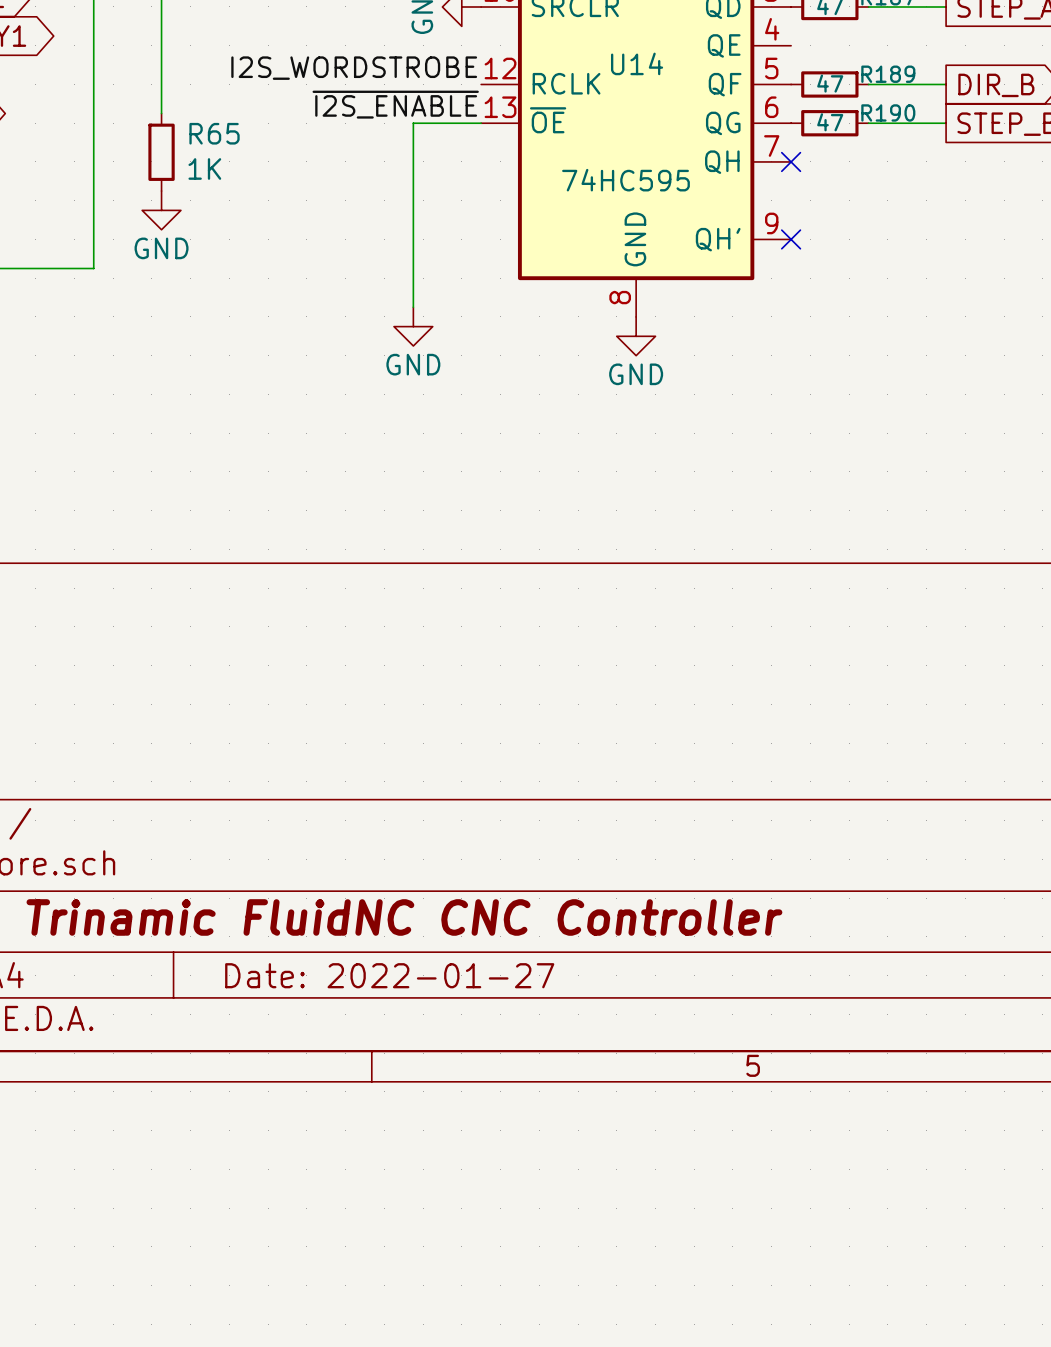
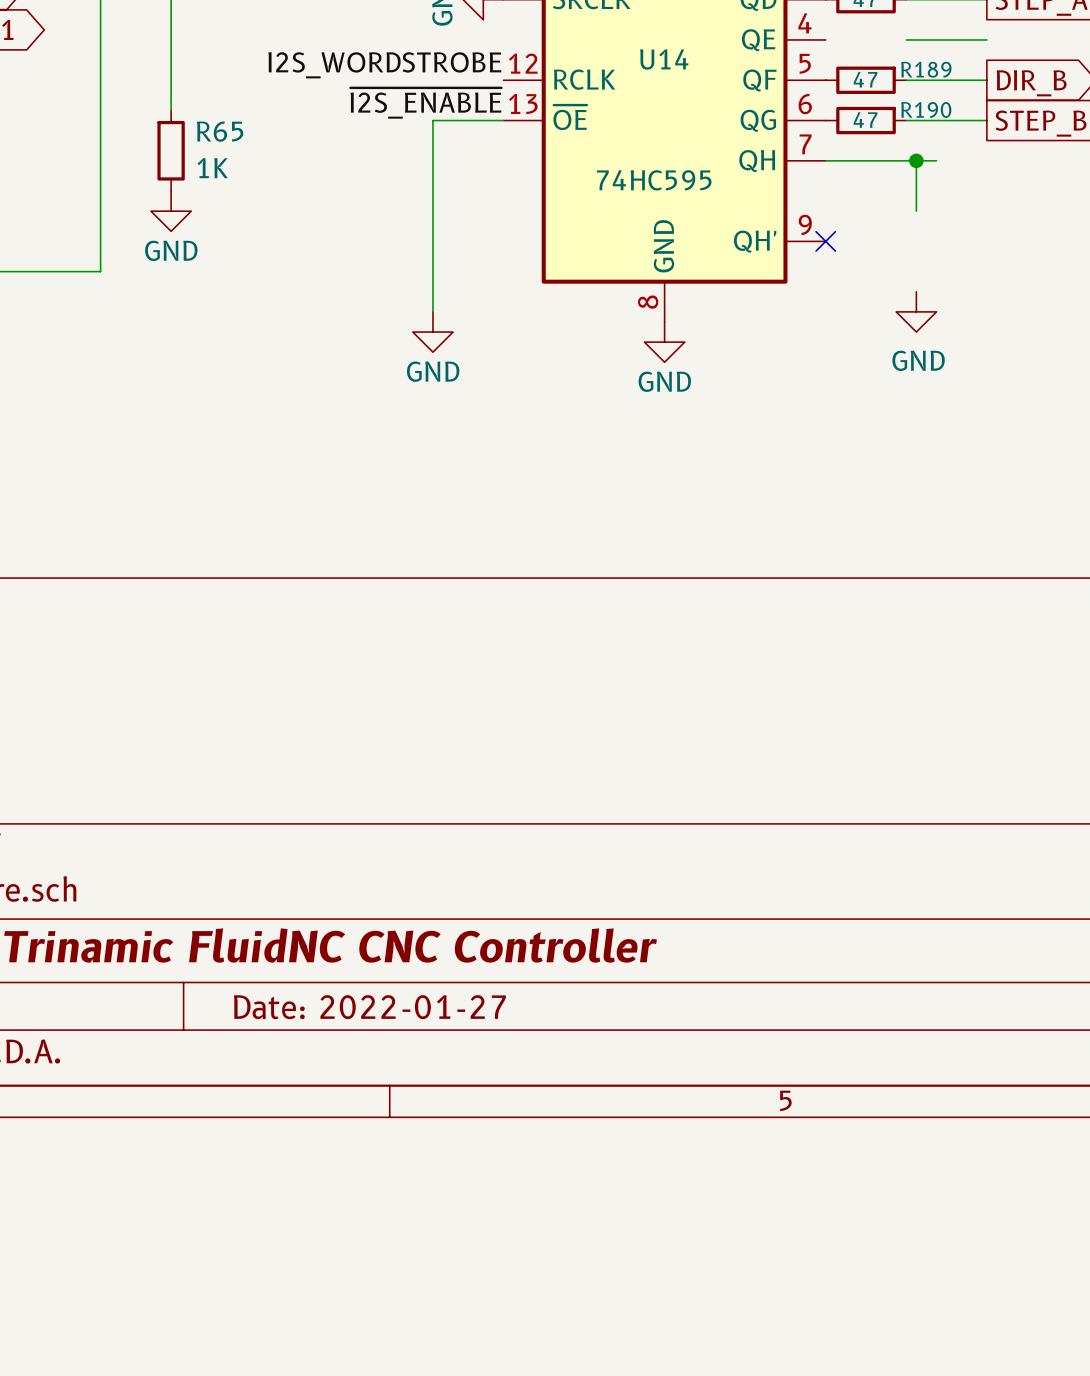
wire: none -> (906, 39) (986, 39)
wire: none -> (825, 160) (936, 160)
no-connect mark: (791, 161) -> none
wire: none -> (916, 160) (916, 211)
junction: none -> (916, 160)
power symbol: none -> GND (916, 311)

